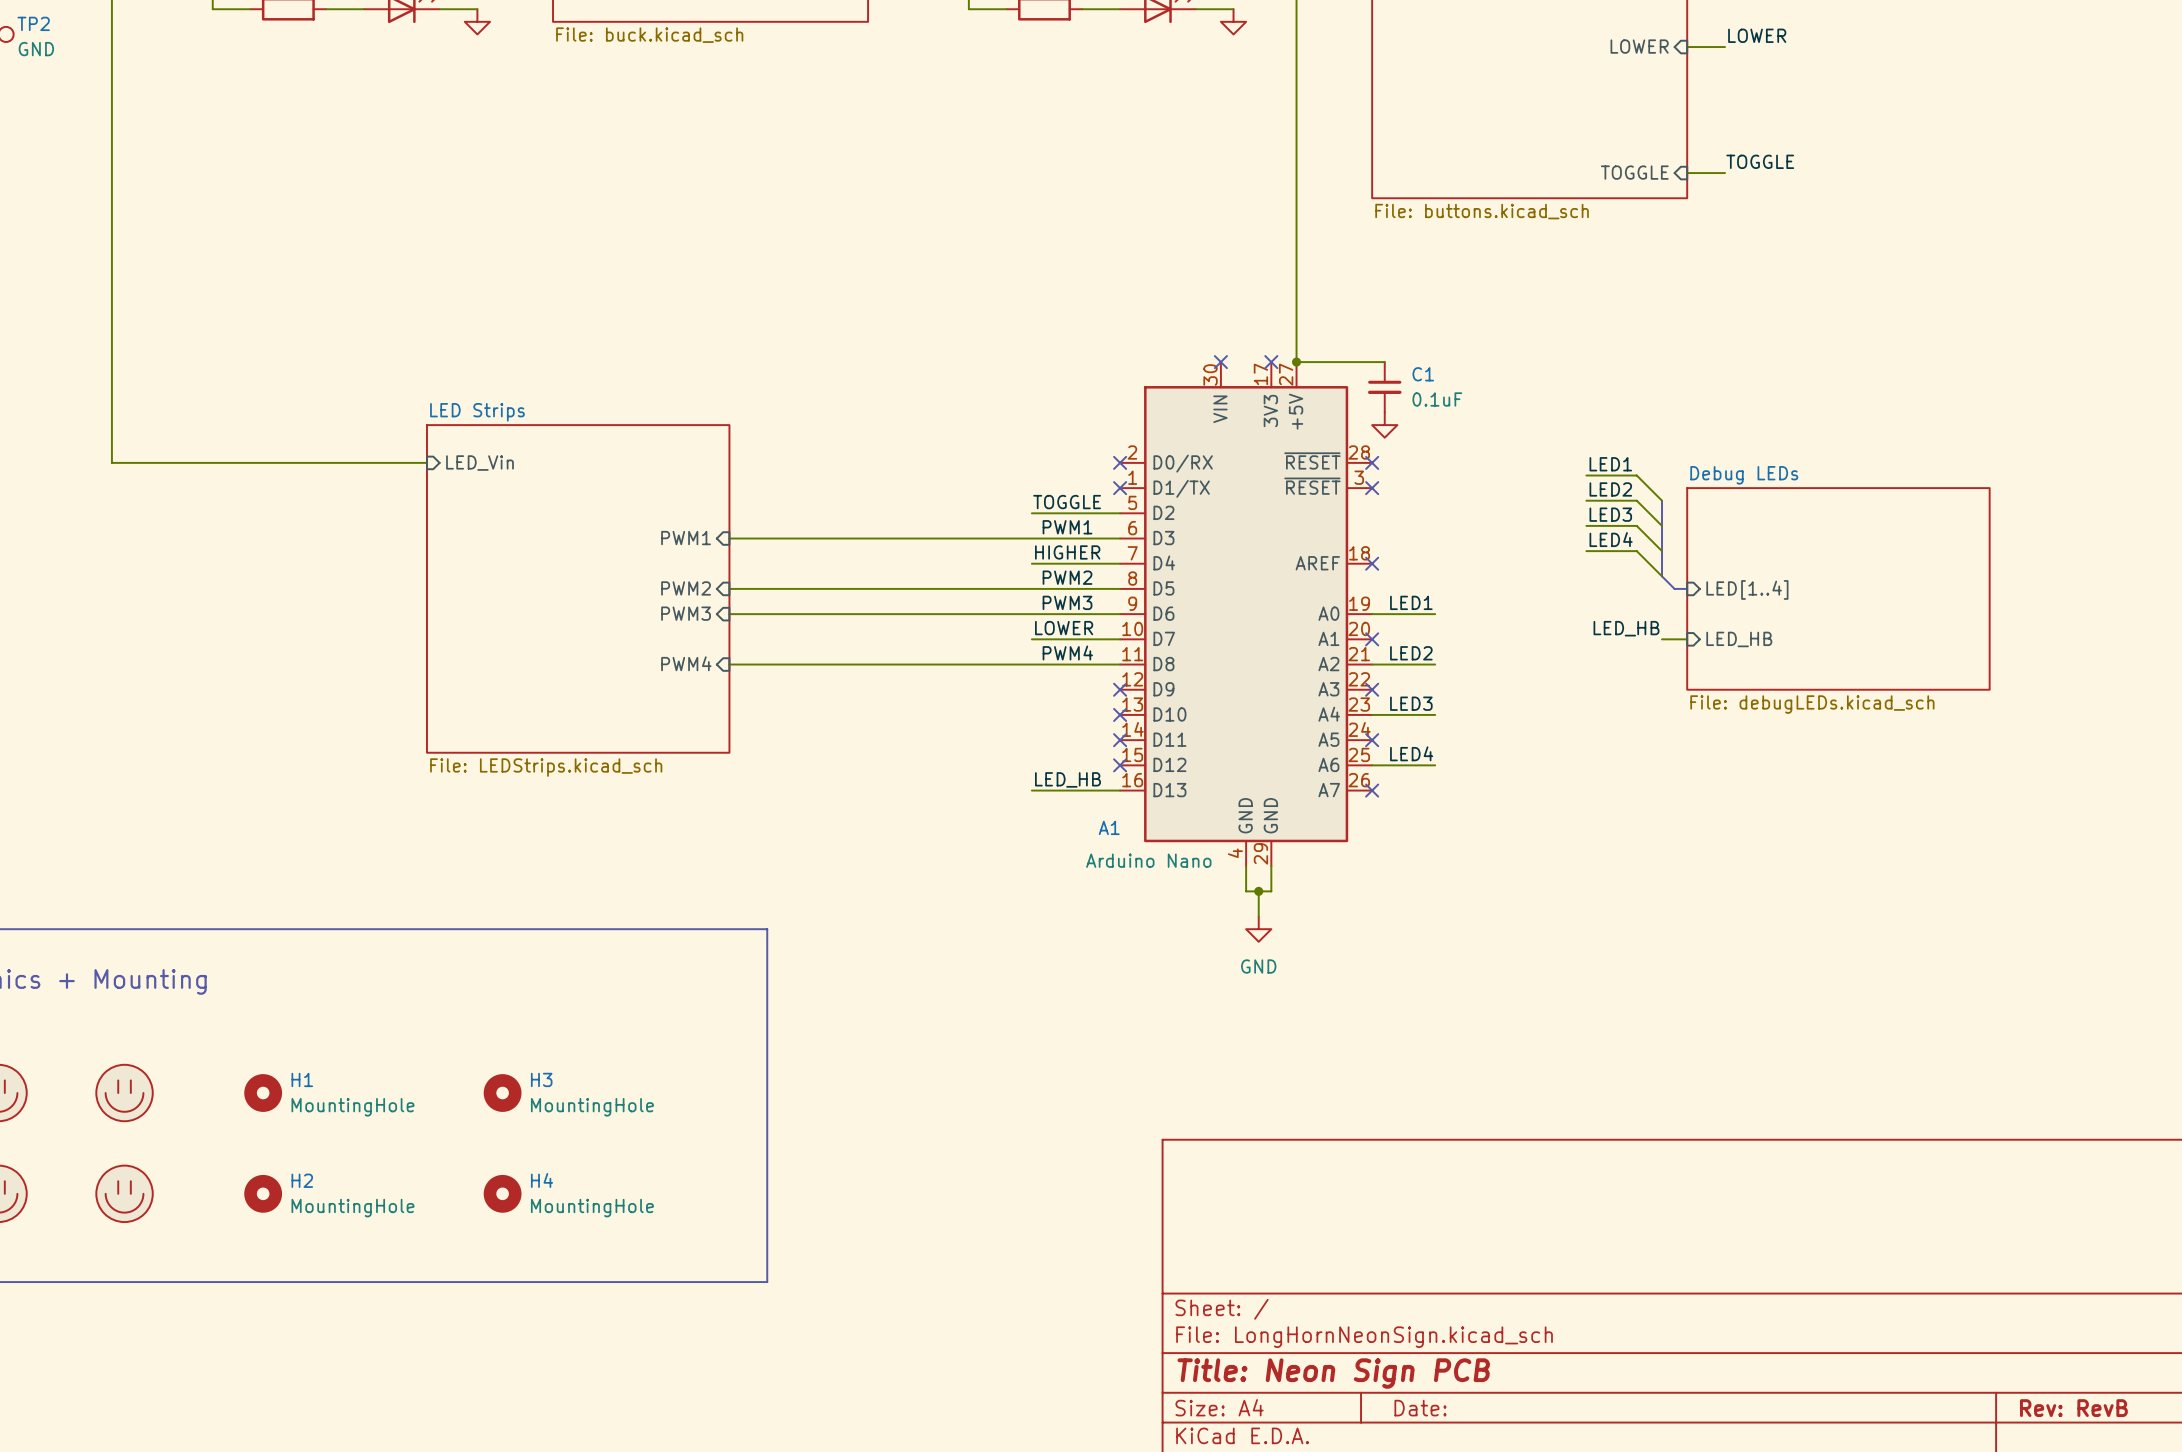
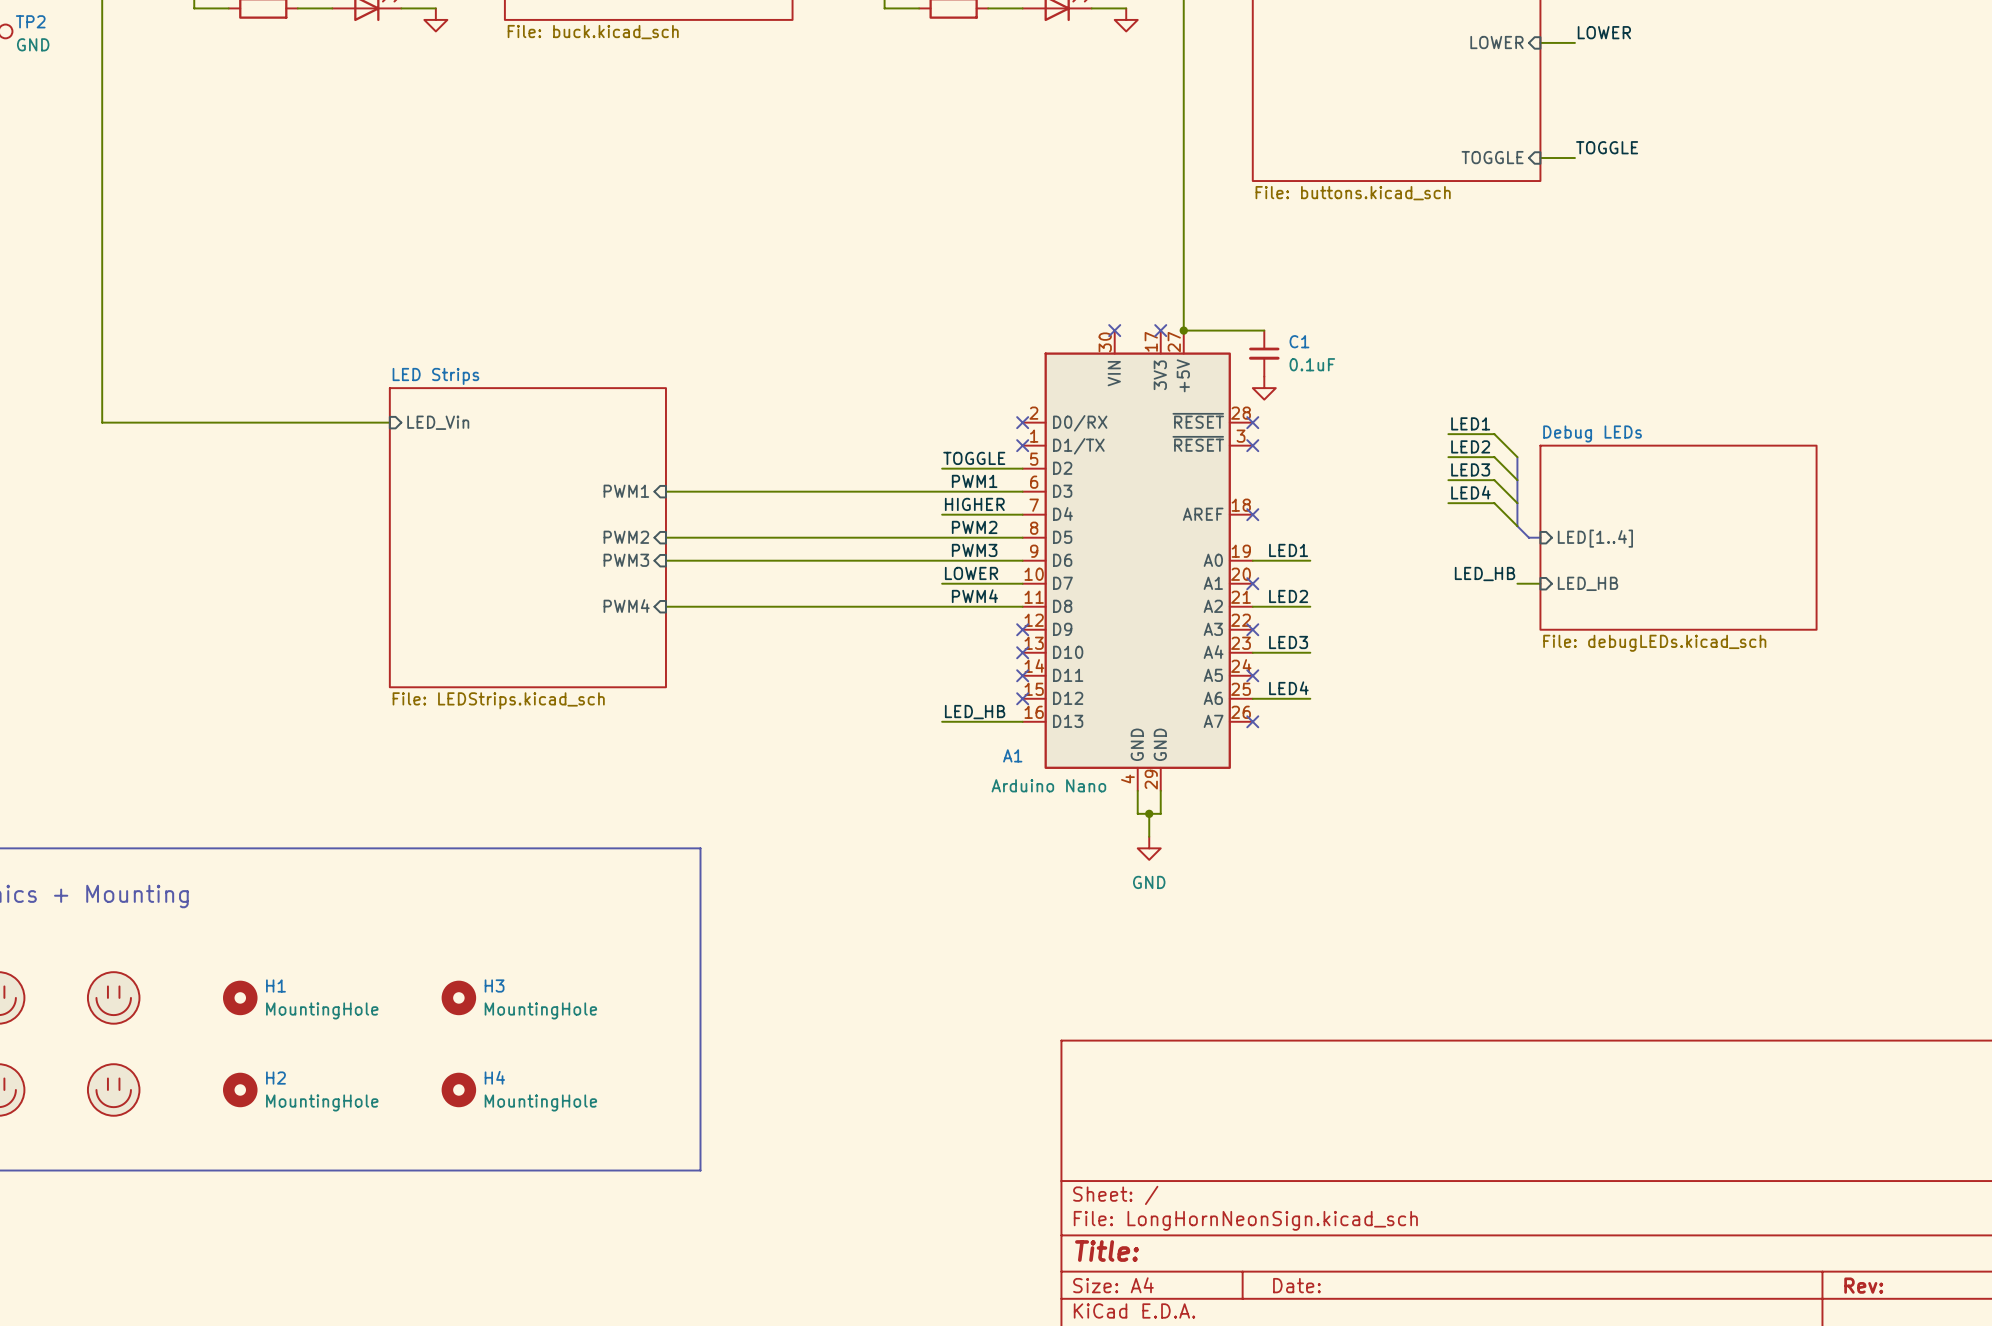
title block: Title: Neon Sign PCB (1333, 1373) -> Title: (1107, 1251)
title block: Rev: RevB (2073, 1408) -> Rev: (1863, 1285)

